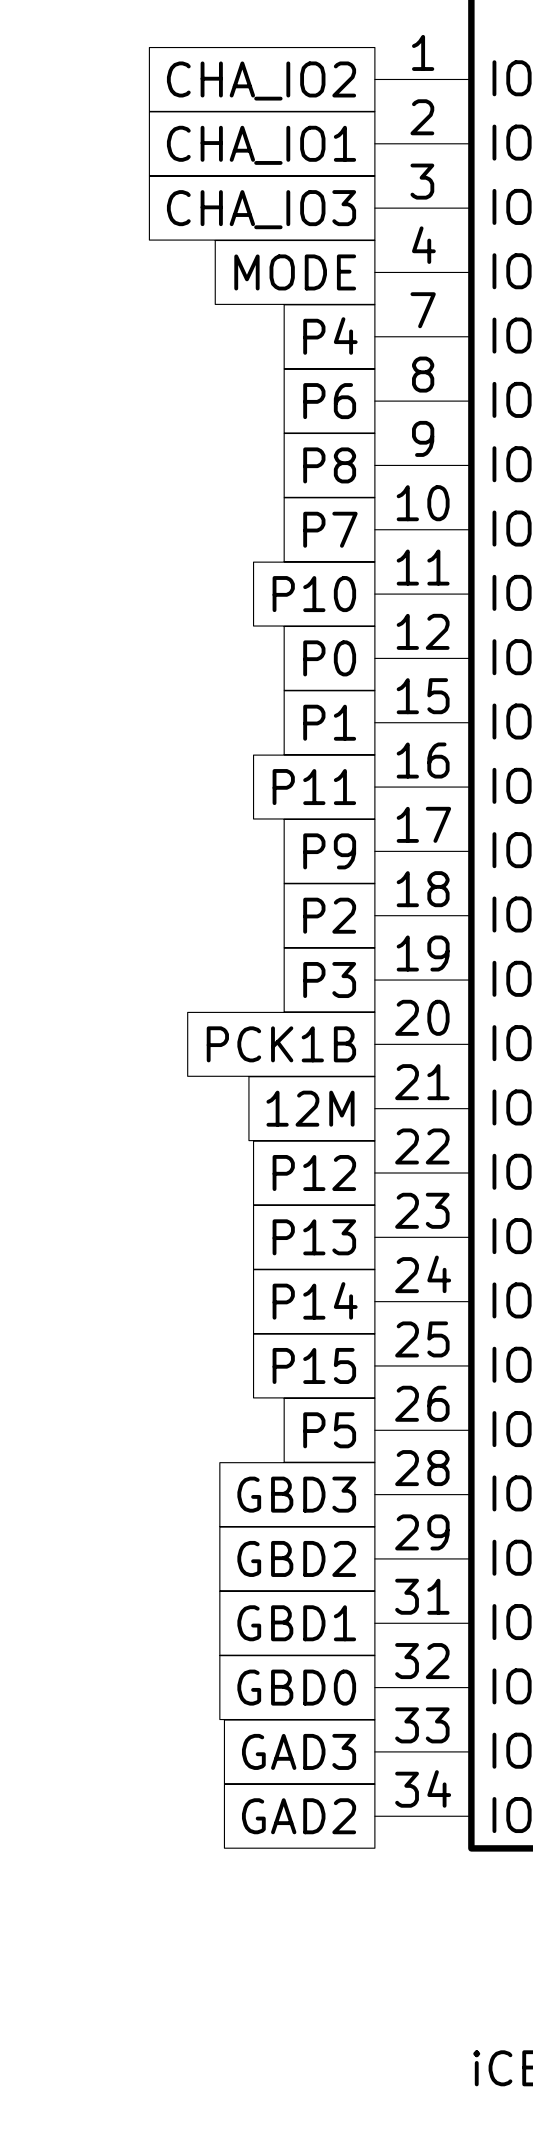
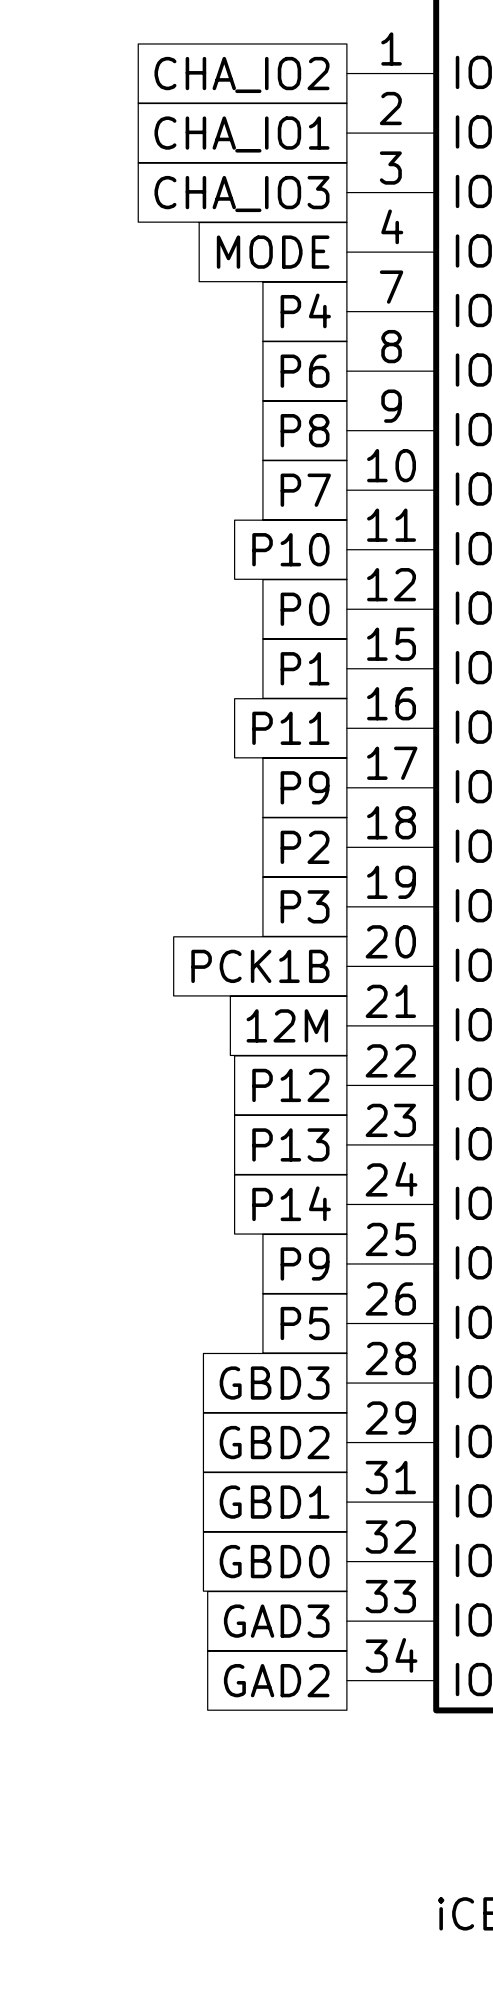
global label: P15 (314, 1365) -> P9 (305, 1263)

